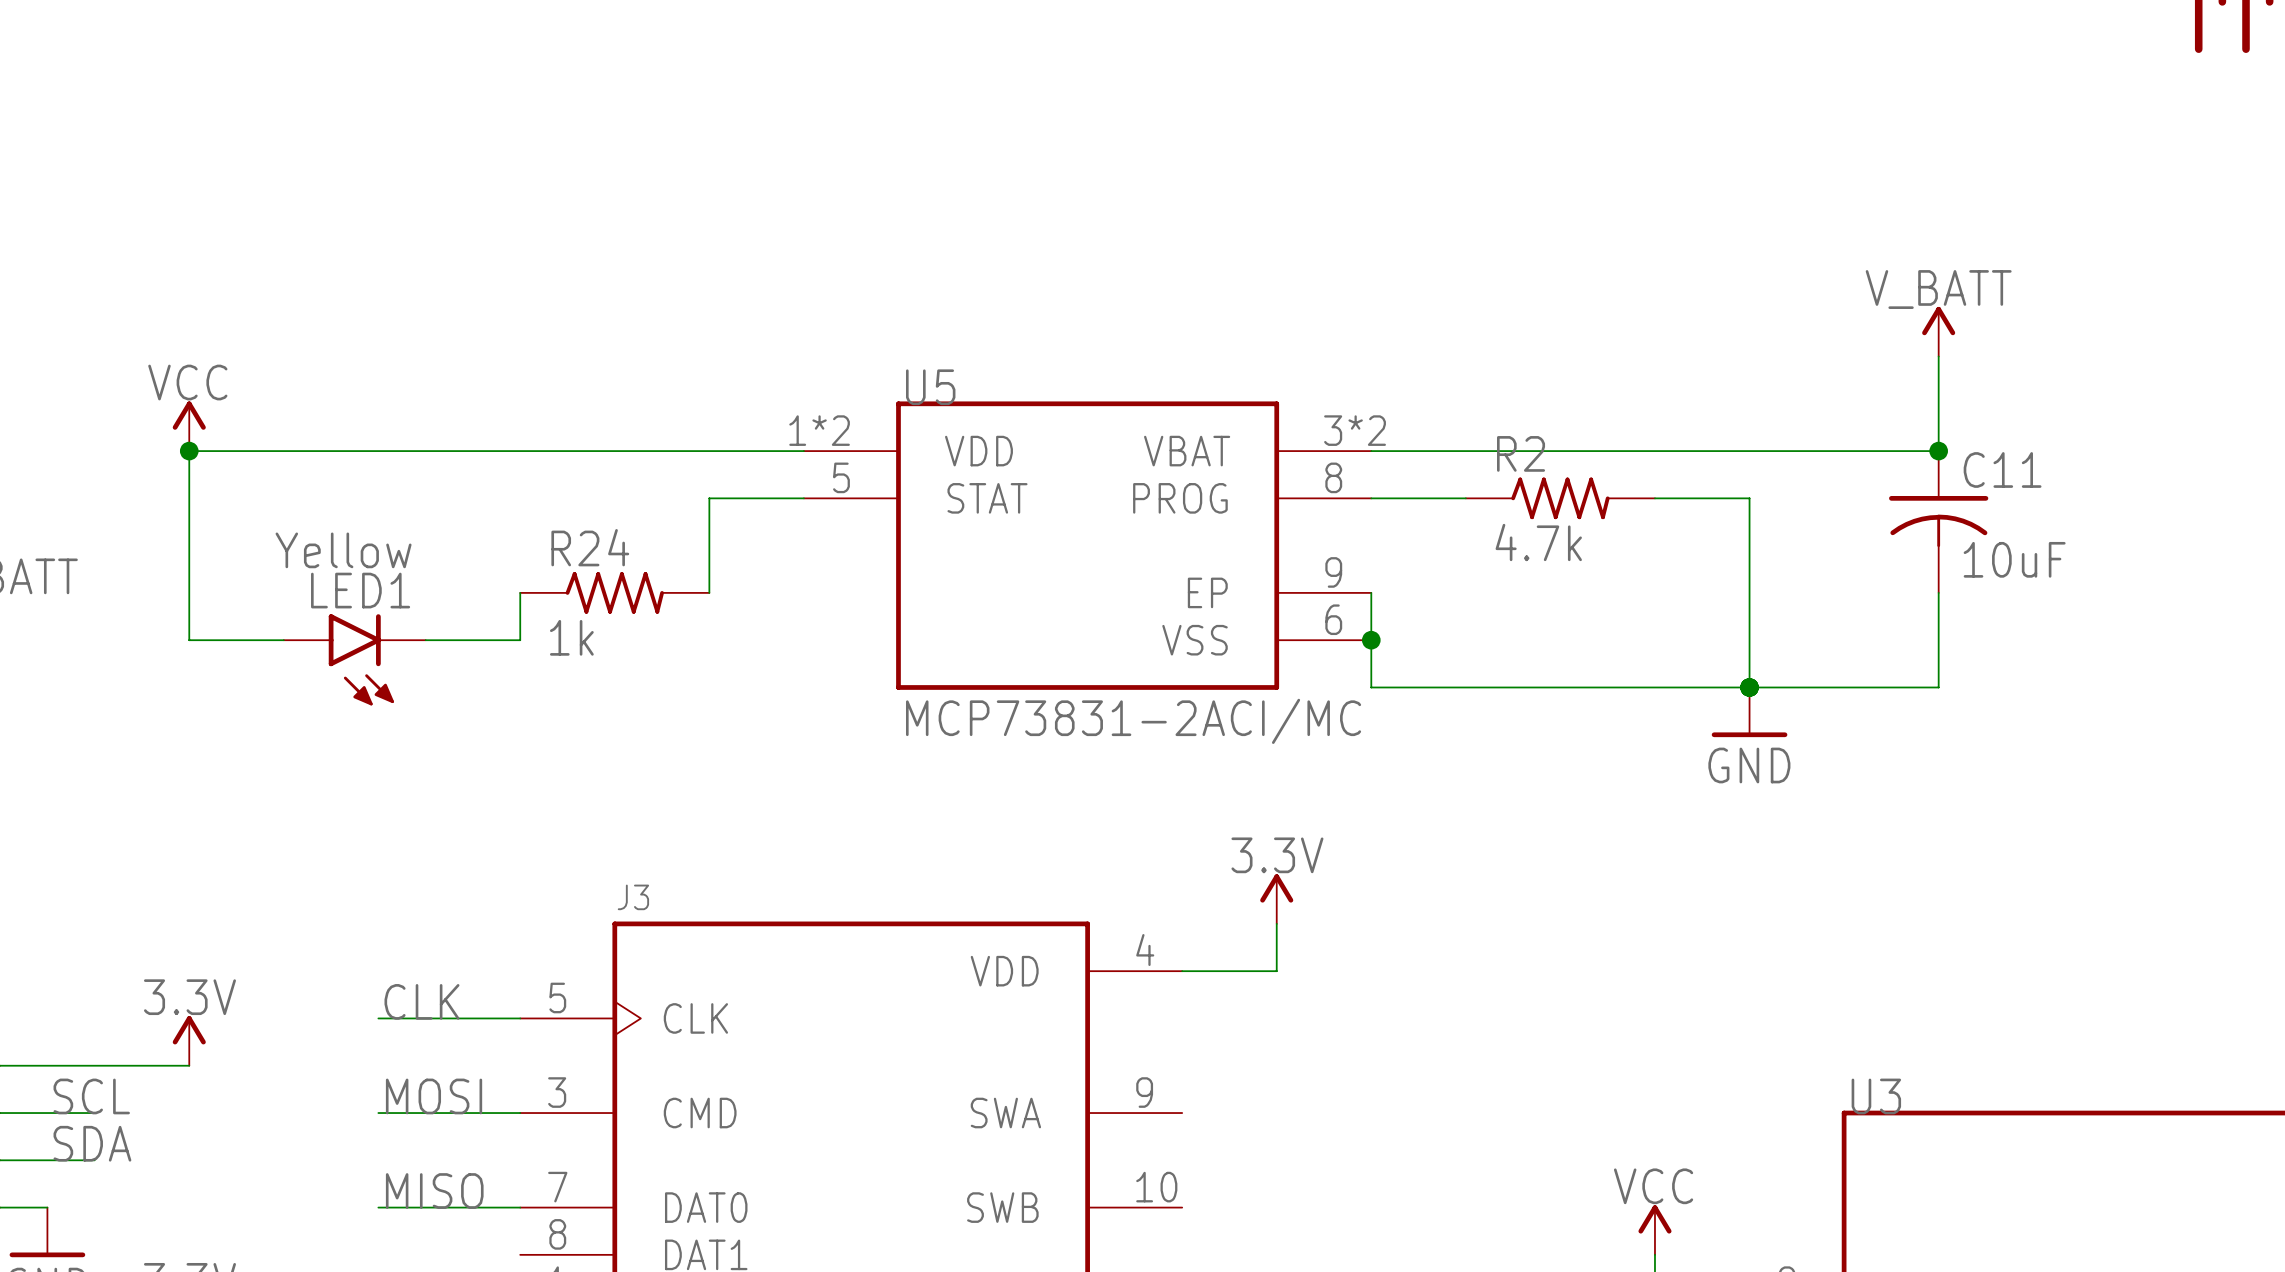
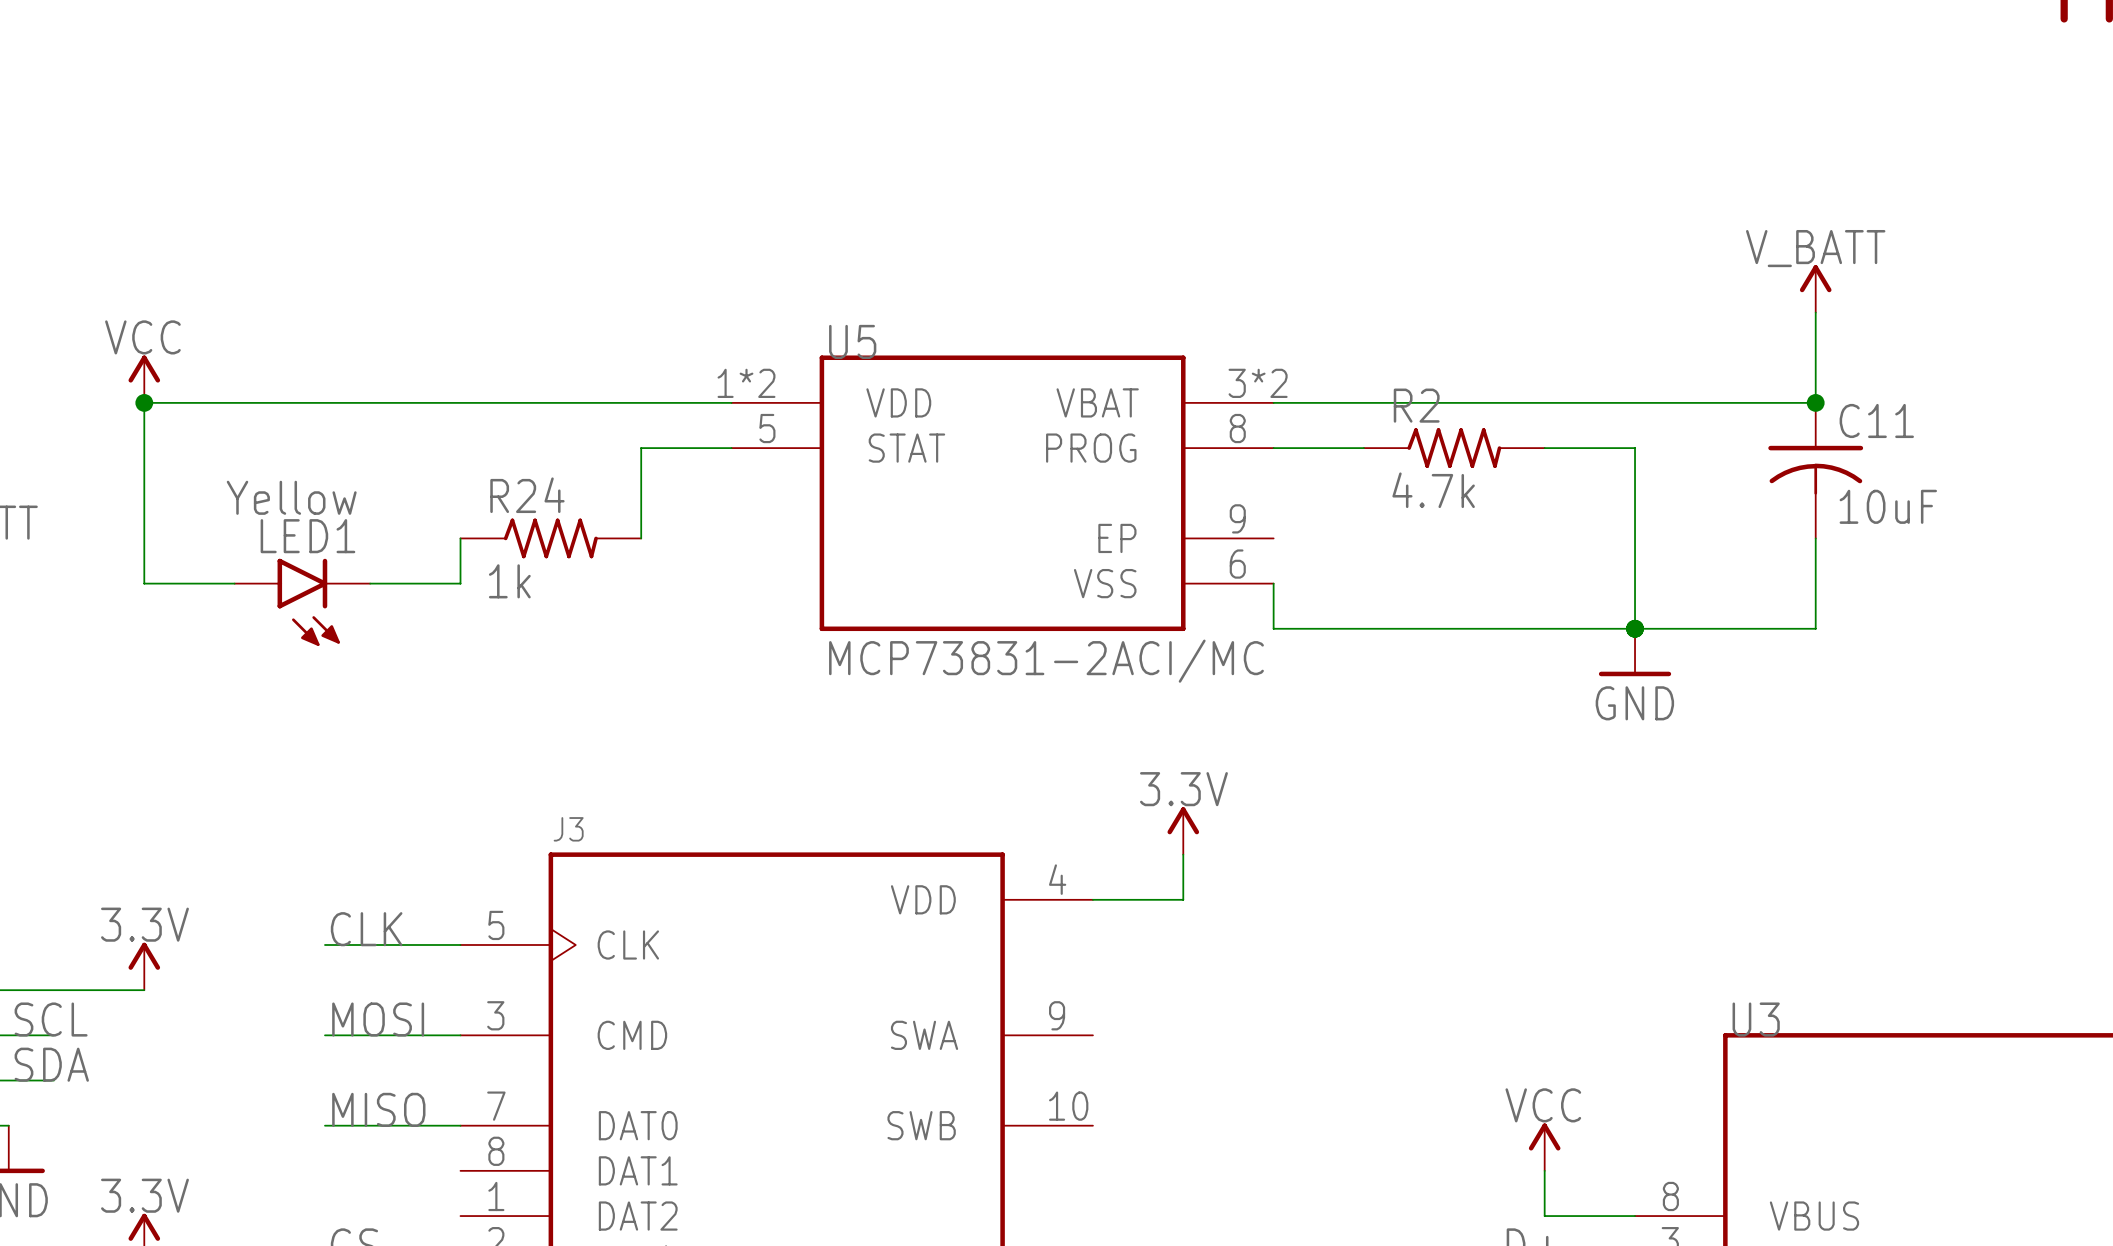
wire: (1371, 592) (1371, 640) -> none
junction: (1371, 640) -> none

